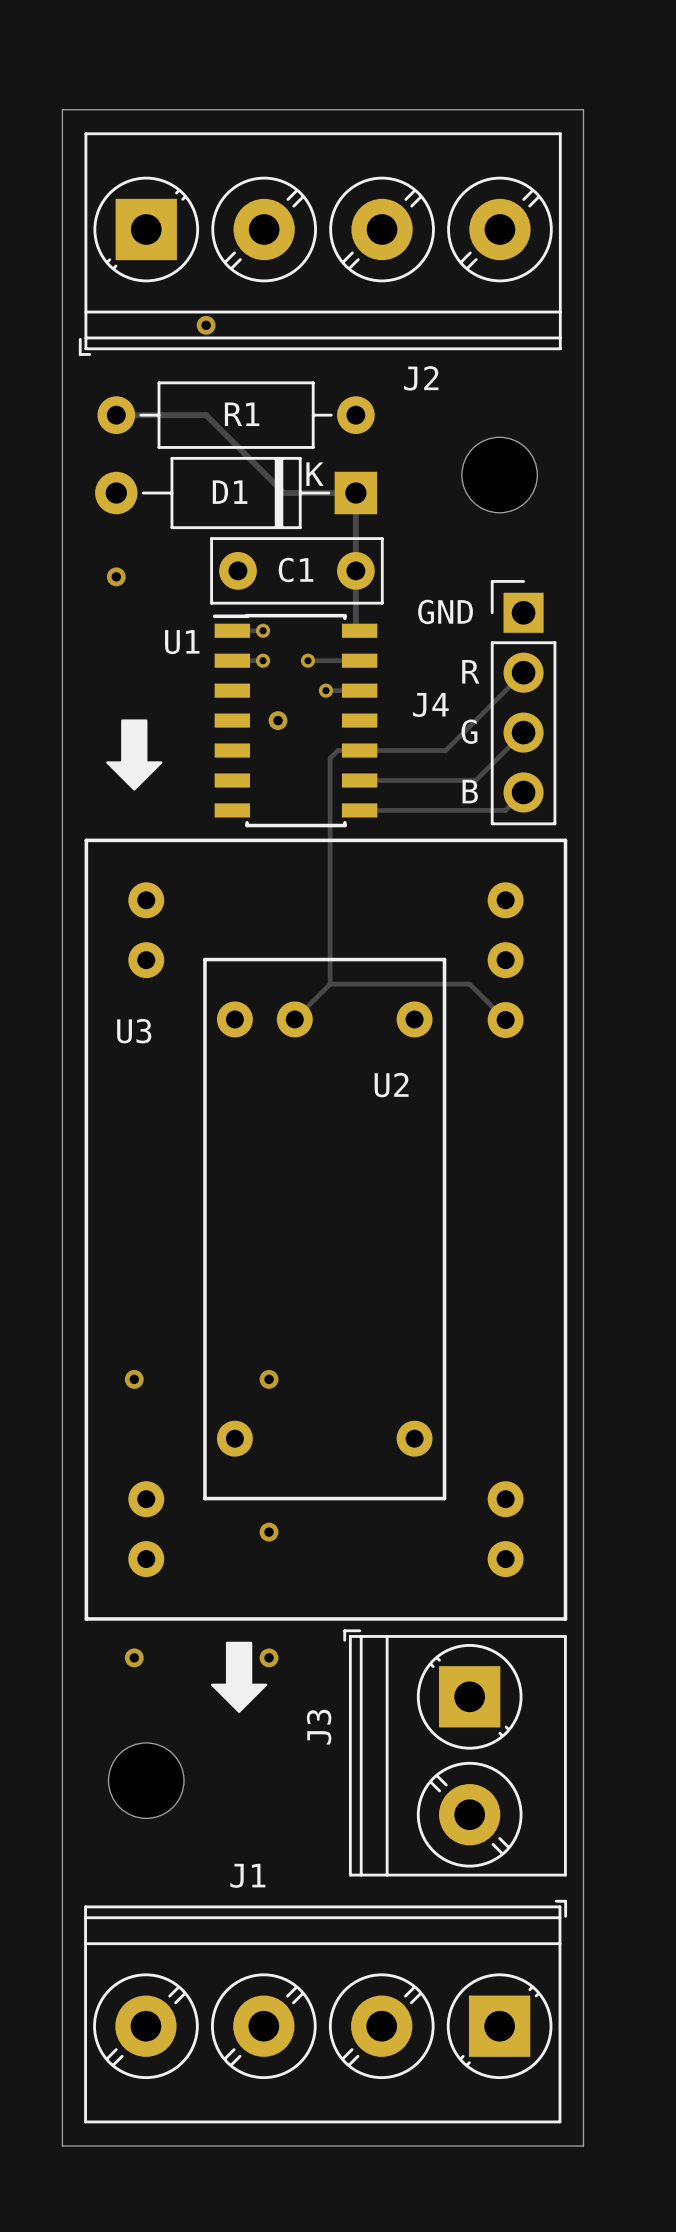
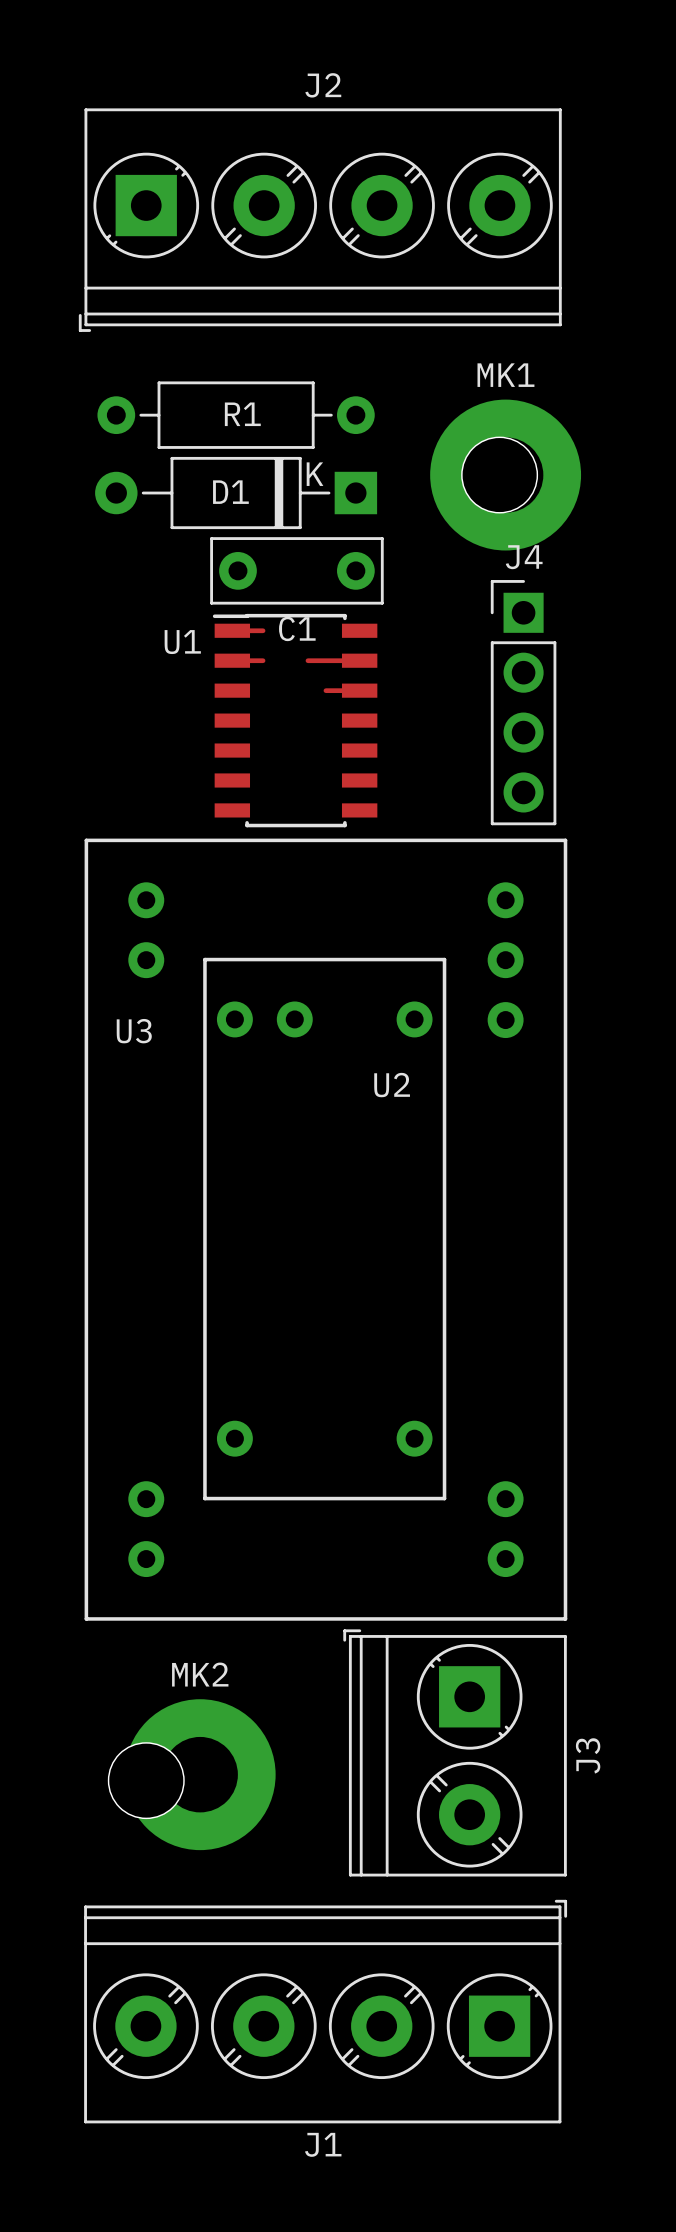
board edge: (62, 109) (62, 2145) (583, 2145) (583, 109) (62, 109) -> none
J2 position: (320, 244) -> (320, 220)
via: (206, 325) -> none
J2 name position: J2 (421, 378) -> J2 (323, 85)
track: (116, 415) (206, 415) (284, 493) (355, 493) (355, 626) (359, 630) -> none
MK1: none -> (505, 475)
C1 name position: C1 (295, 570) -> C1 (297, 628)
via: (116, 576) -> none
text: GND (445, 611) -> none
via: (263, 630) -> none
via: (263, 660) -> none
via: (307, 660) -> none
text: R (470, 671) -> none
track: (523, 672) (445, 750) (337, 750) (330, 758) (330, 984) -> none
via: (325, 690) -> none
J4 name position: J4 (430, 704) -> J4 (524, 557)
drawing: [106, 719, 163, 791] -> none
via: (278, 720) -> none
text: G (469, 731) -> none
track: (523, 732) (475, 780) (359, 780) -> none
text: B (470, 791) -> none
track: (523, 792) (505, 810) (359, 810) -> none
track: (330, 984) (469, 984) (505, 1020) -> none
track: (330, 984) (294, 1019) -> none
via: (134, 1379) -> none
via: (269, 1379) -> none
via: (269, 1532) -> none
drawing: [210, 1641, 268, 1713] -> none
via: (134, 1657) -> none
via: (269, 1657) -> none
J3 name position: J3 (319, 1727) -> J3 (588, 1755)
MK2: none -> (200, 1774)
J1 name position: J1 (247, 1875) -> J1 (323, 2144)

